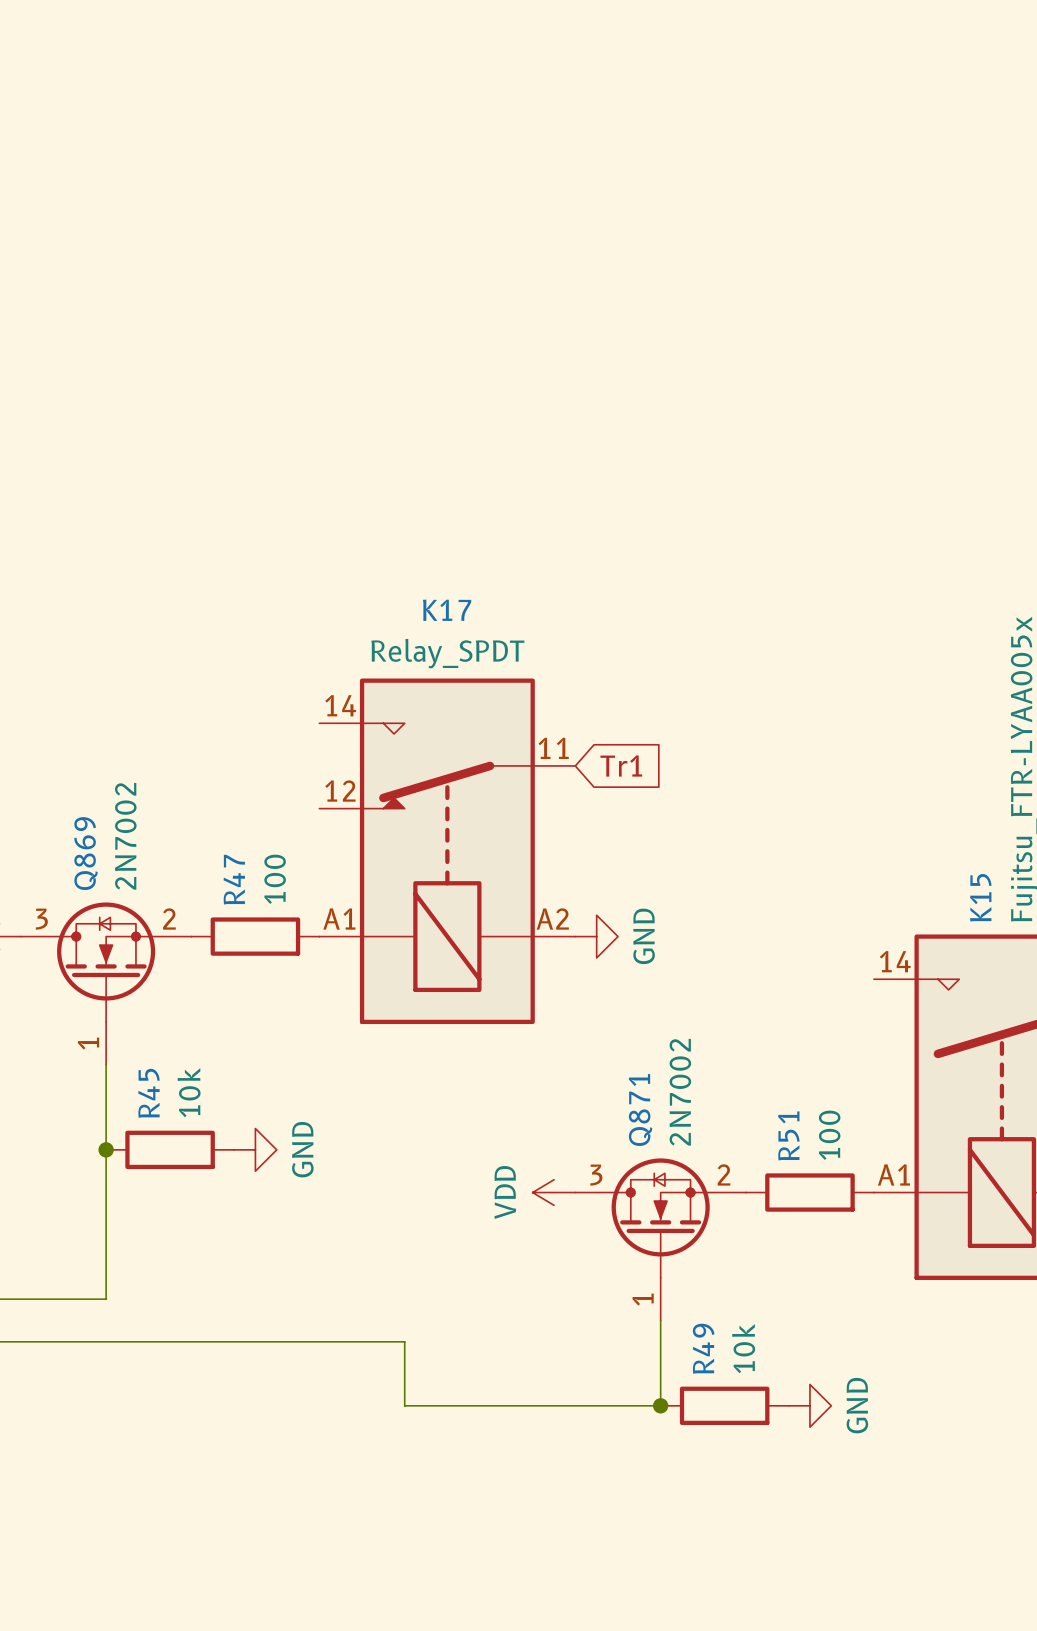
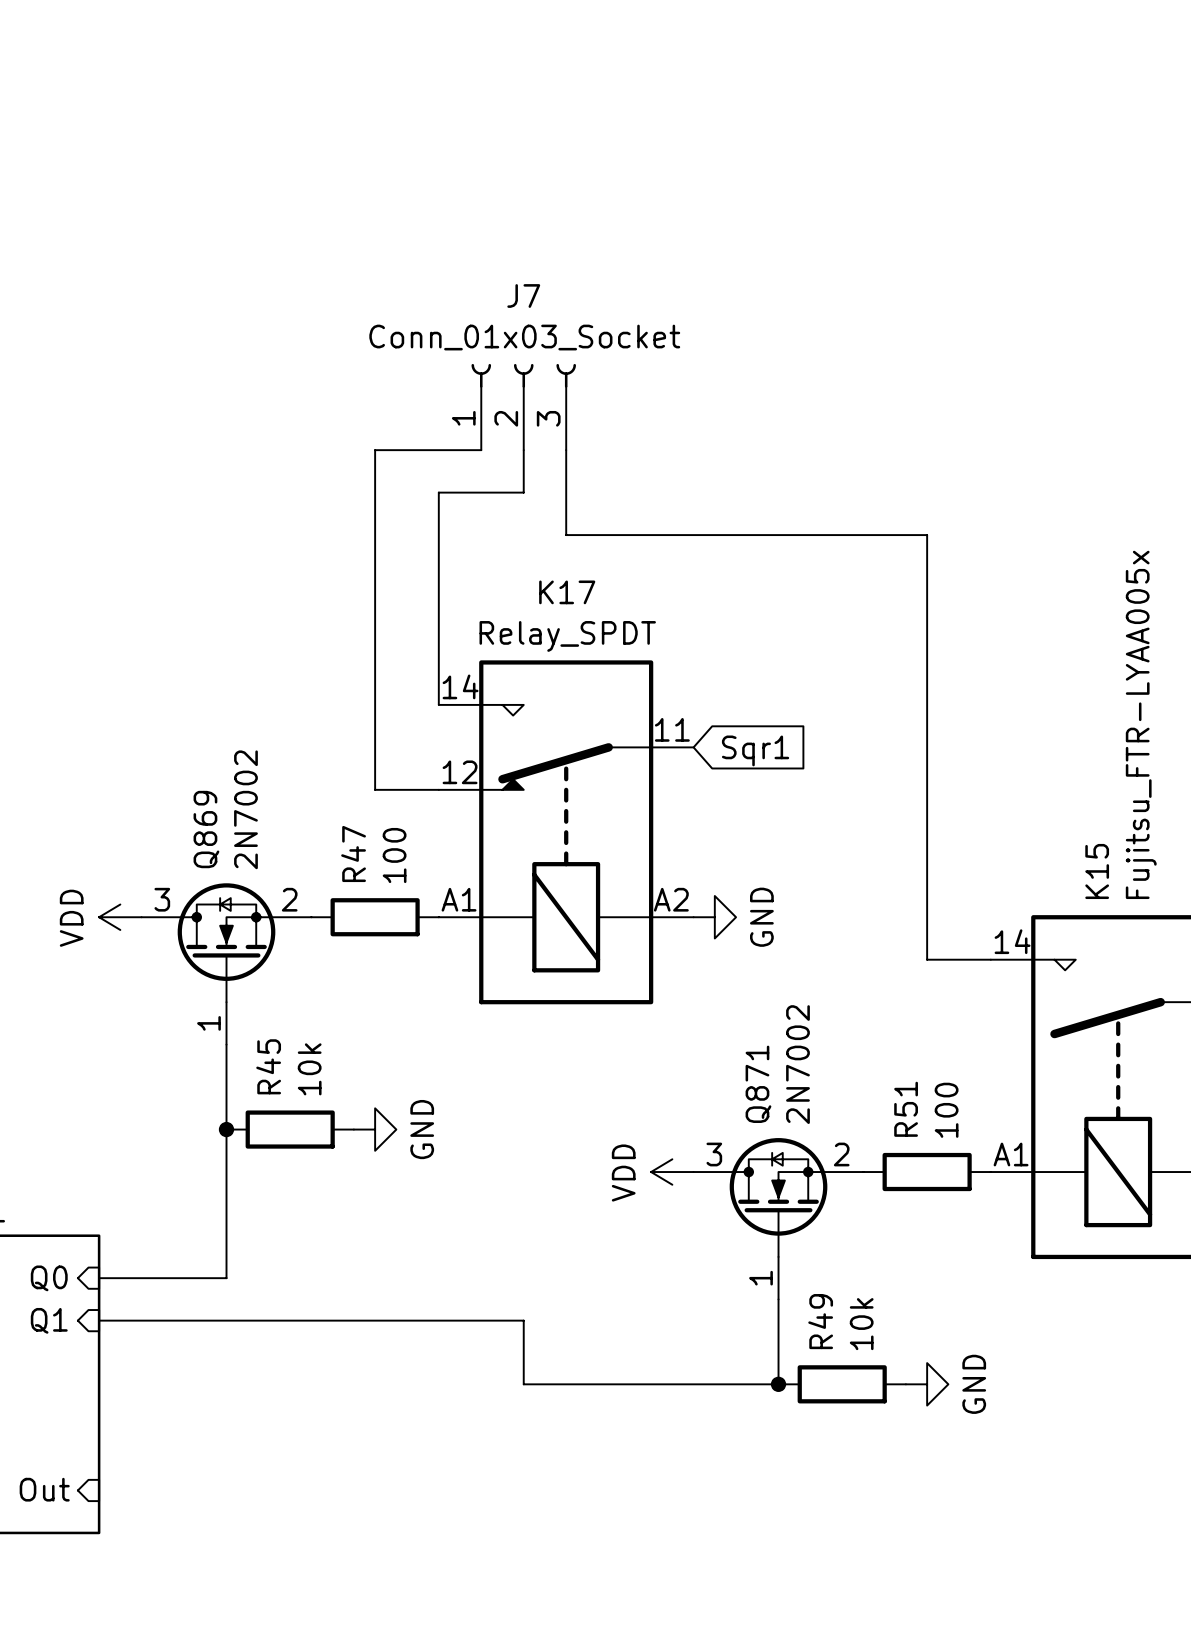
J7: none -> Conn_01x03_Socket (523, 407)
wire: none -> (481, 450) (375, 450) (375, 789) (438, 789)
wire: none -> (523, 450) (523, 492) (438, 492) (438, 704)
wire: none -> (566, 450) (566, 535) (927, 535) (927, 959) (990, 959)
global label: Tr1 (621, 765) -> Sqr1 (755, 750)

